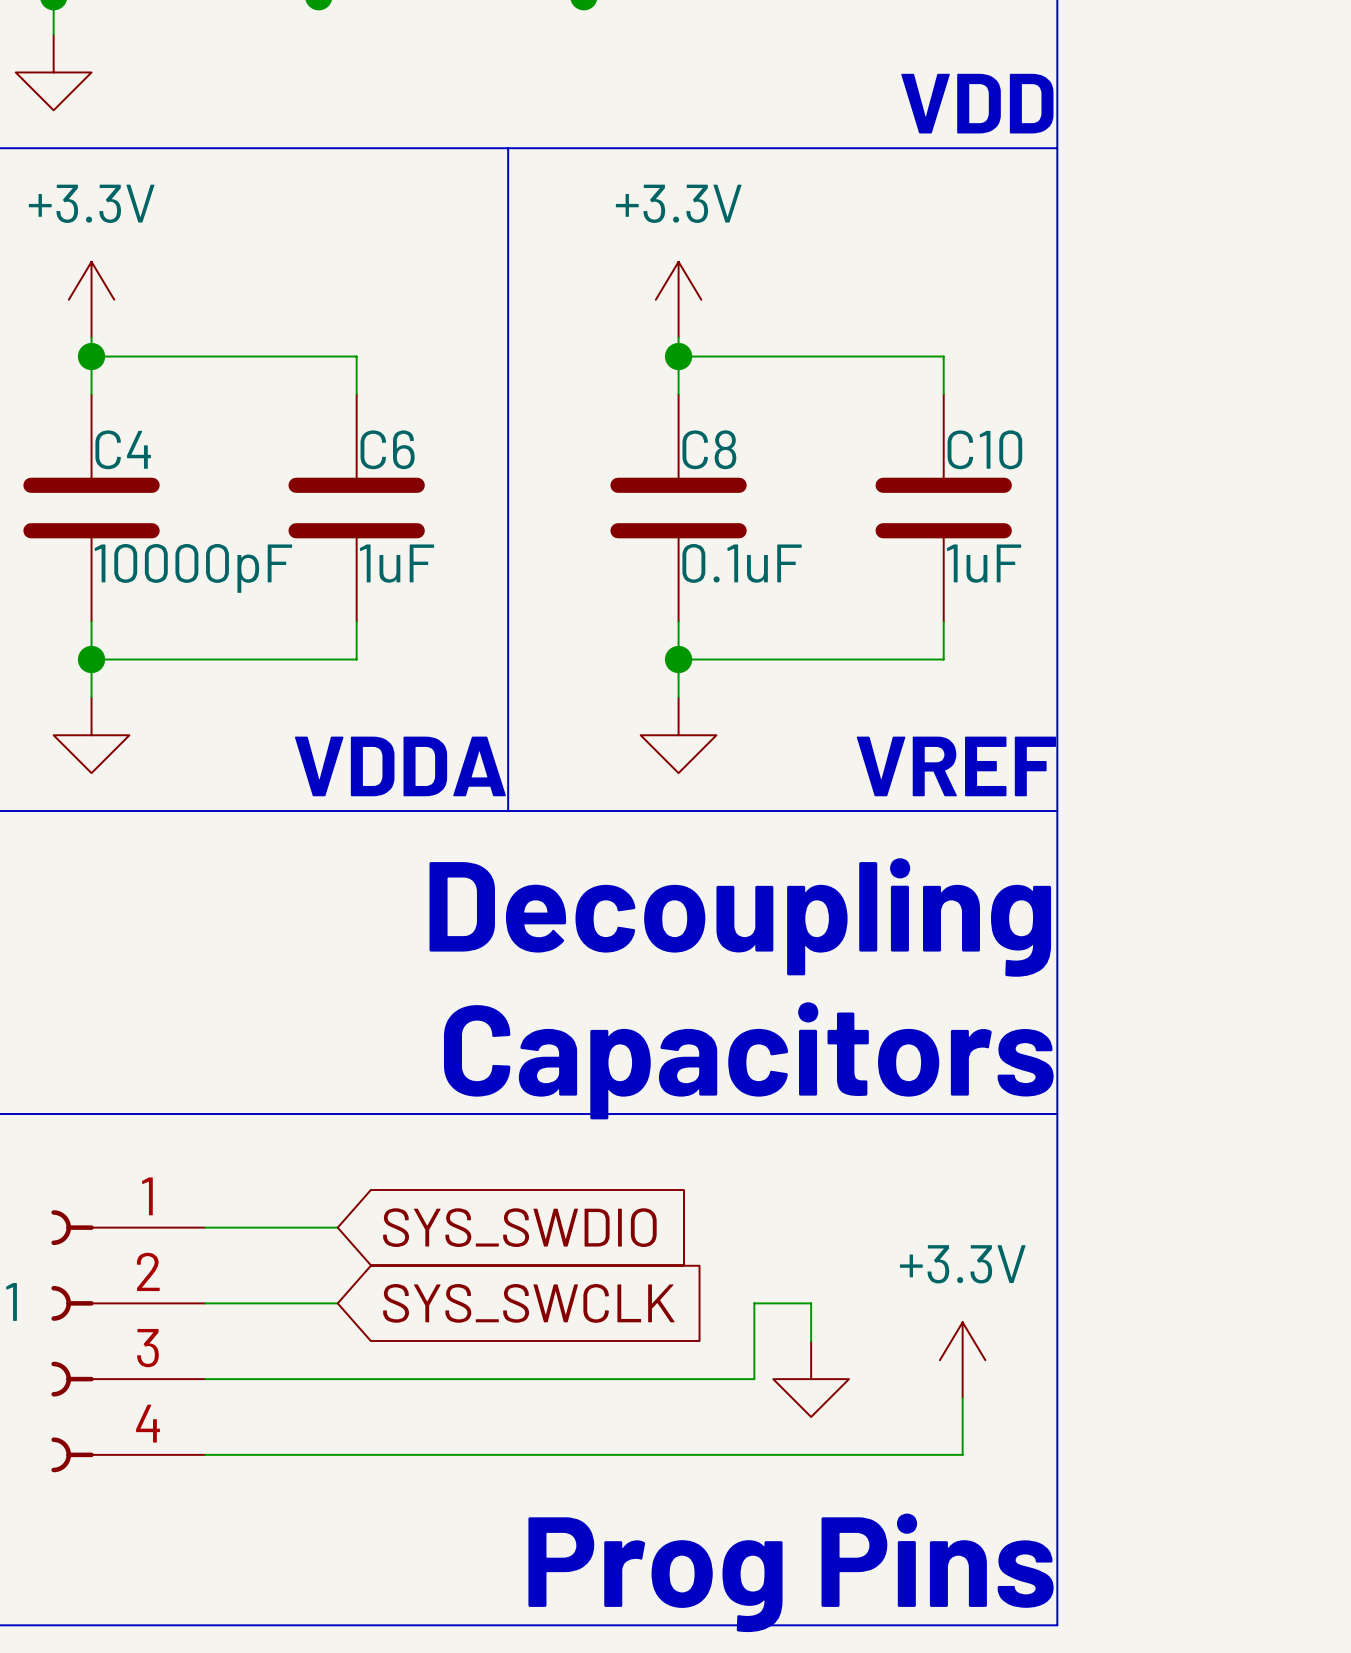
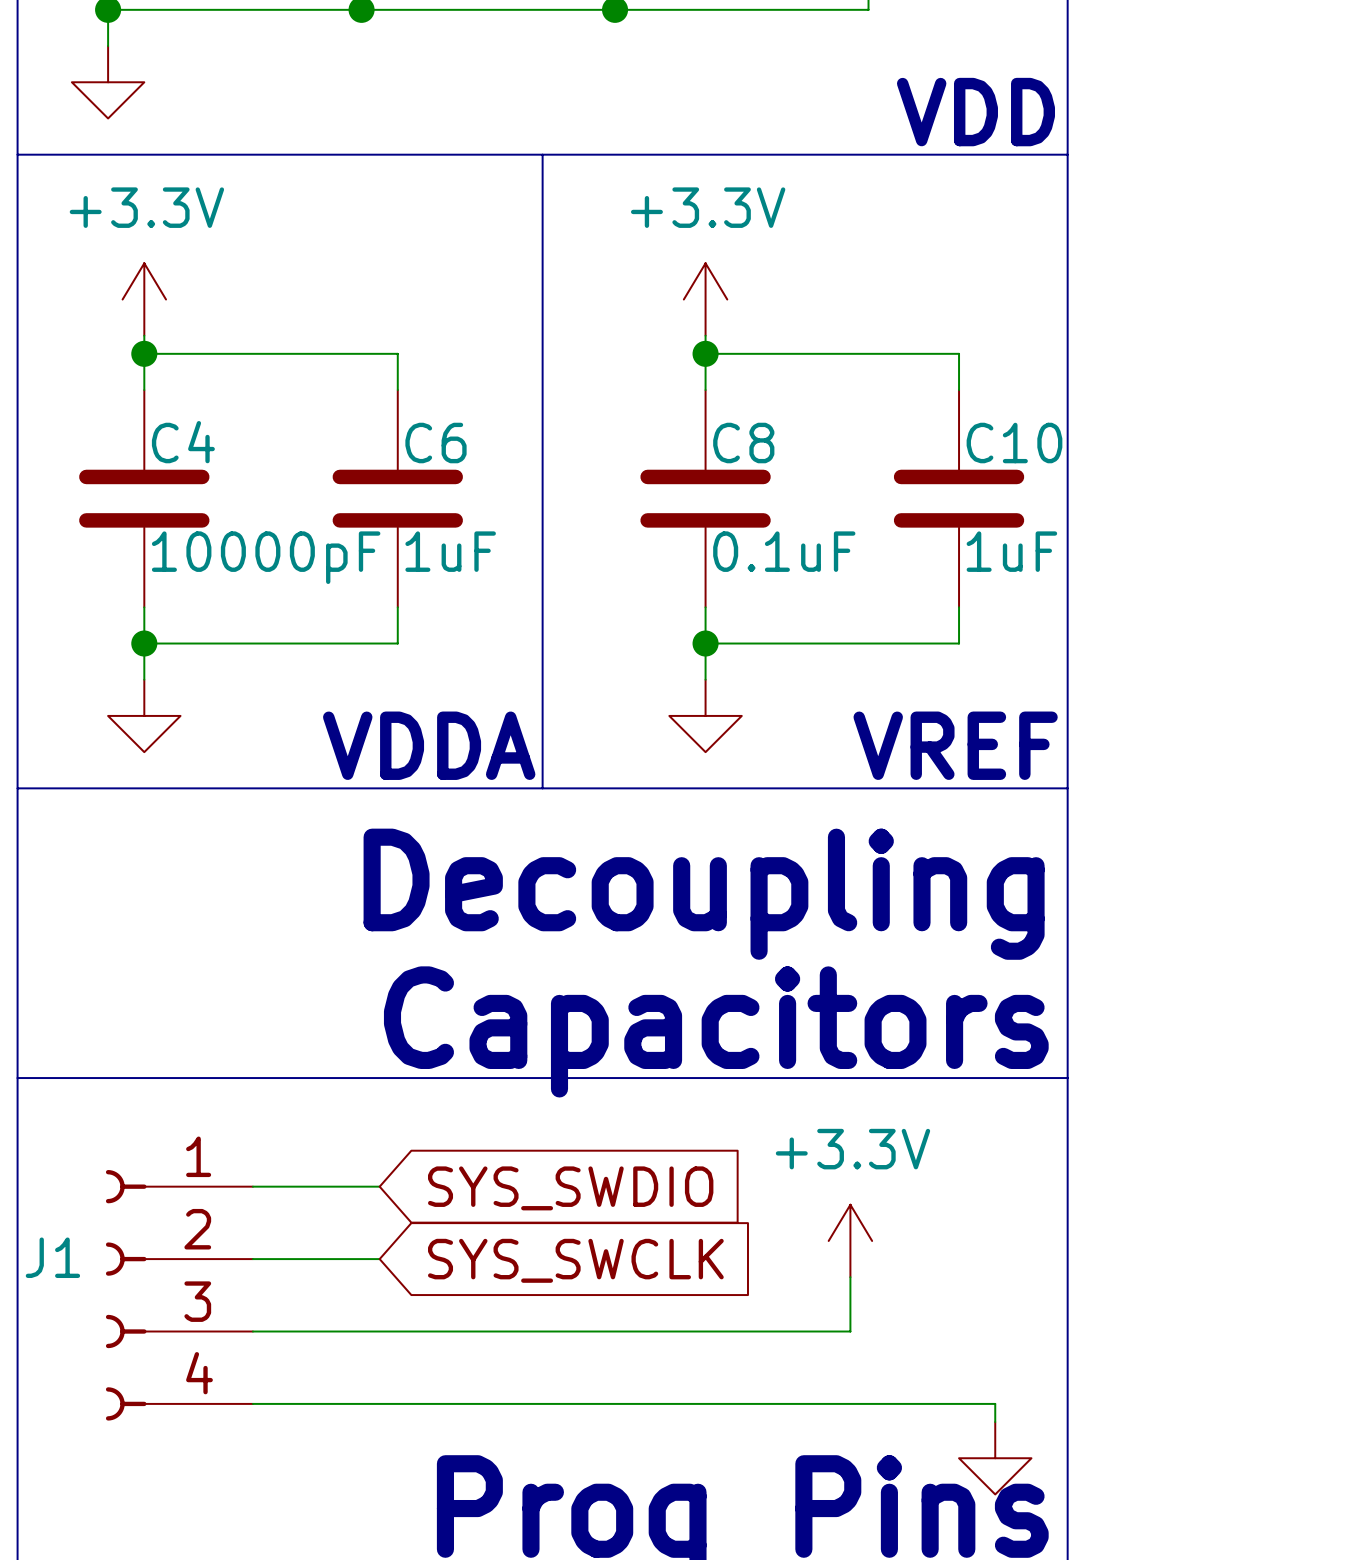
wire: (811, 1341) (811, 1303) (754, 1303) (754, 1379) -> (850, 1277) (850, 1331) (777, 1331)
power symbol position: +3.3V (962, 1360) -> +3.3V (850, 1240)
power symbol position: (811, 1379) -> (995, 1458)
wire: (962, 1398) (962, 1454) -> (995, 1422) (995, 1403) (977, 1403)

